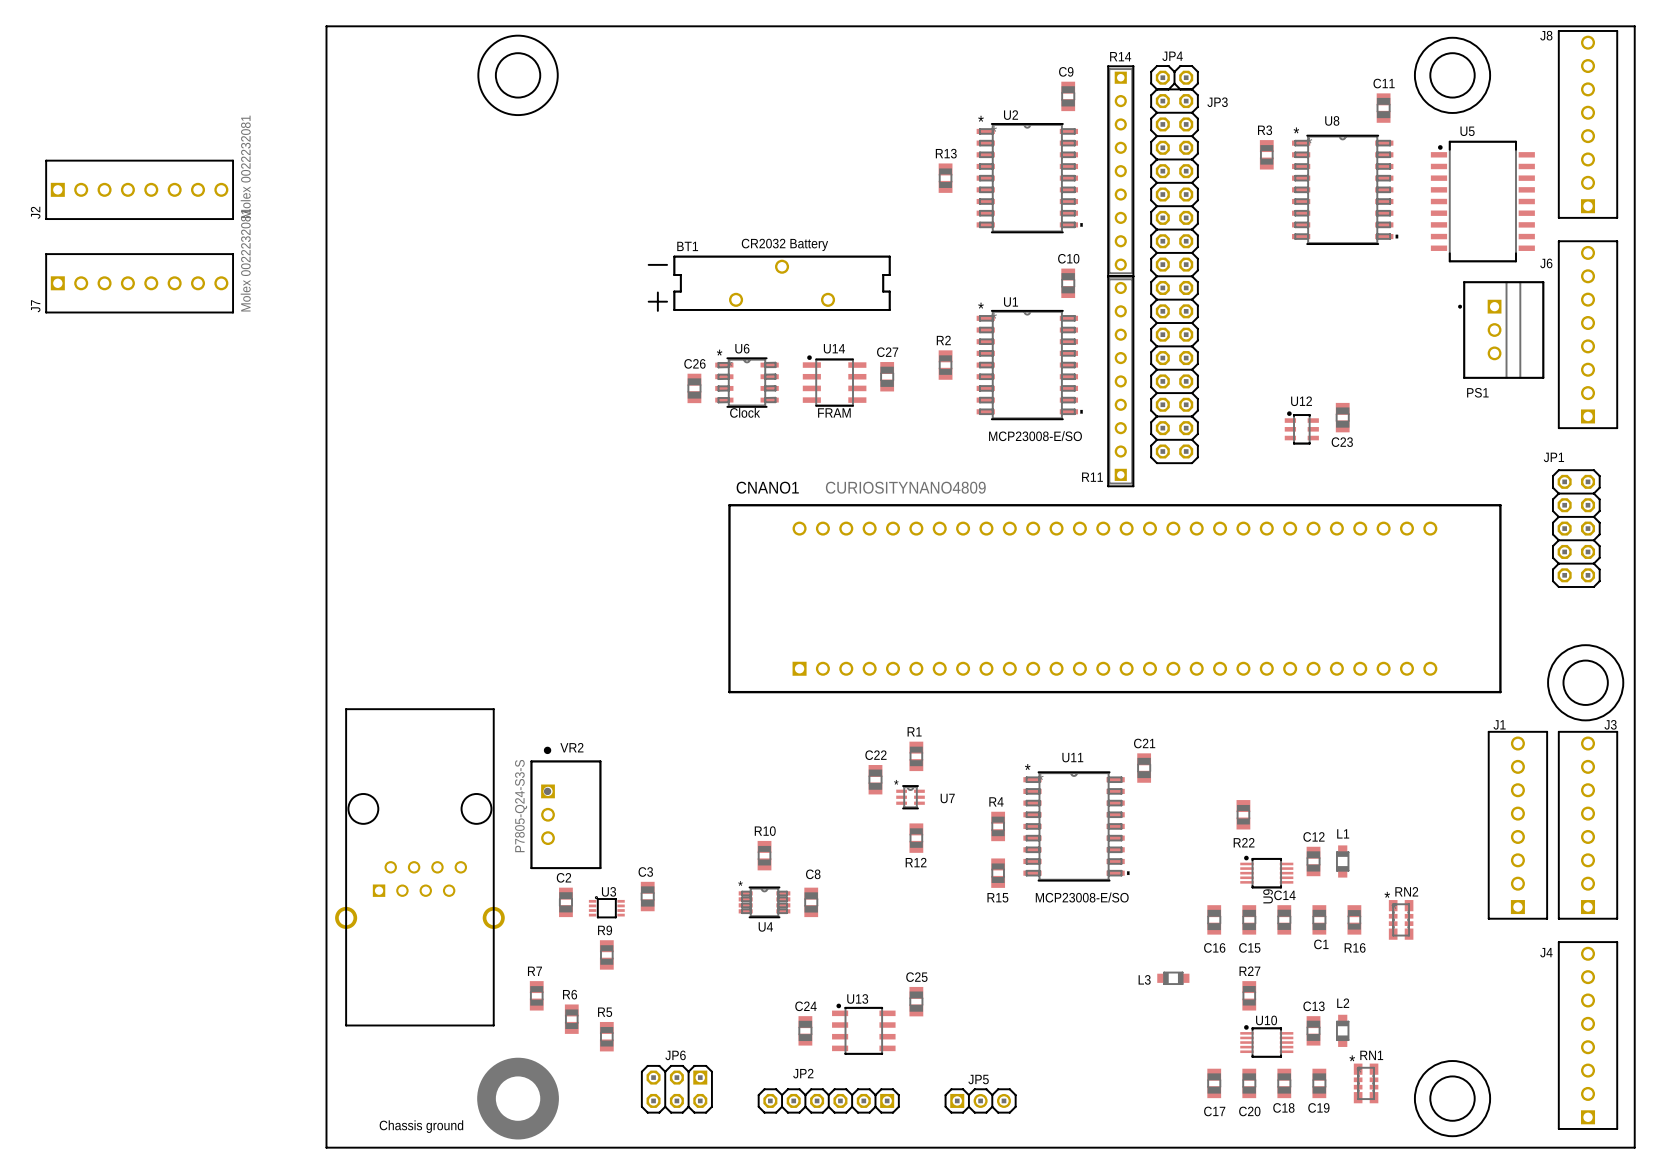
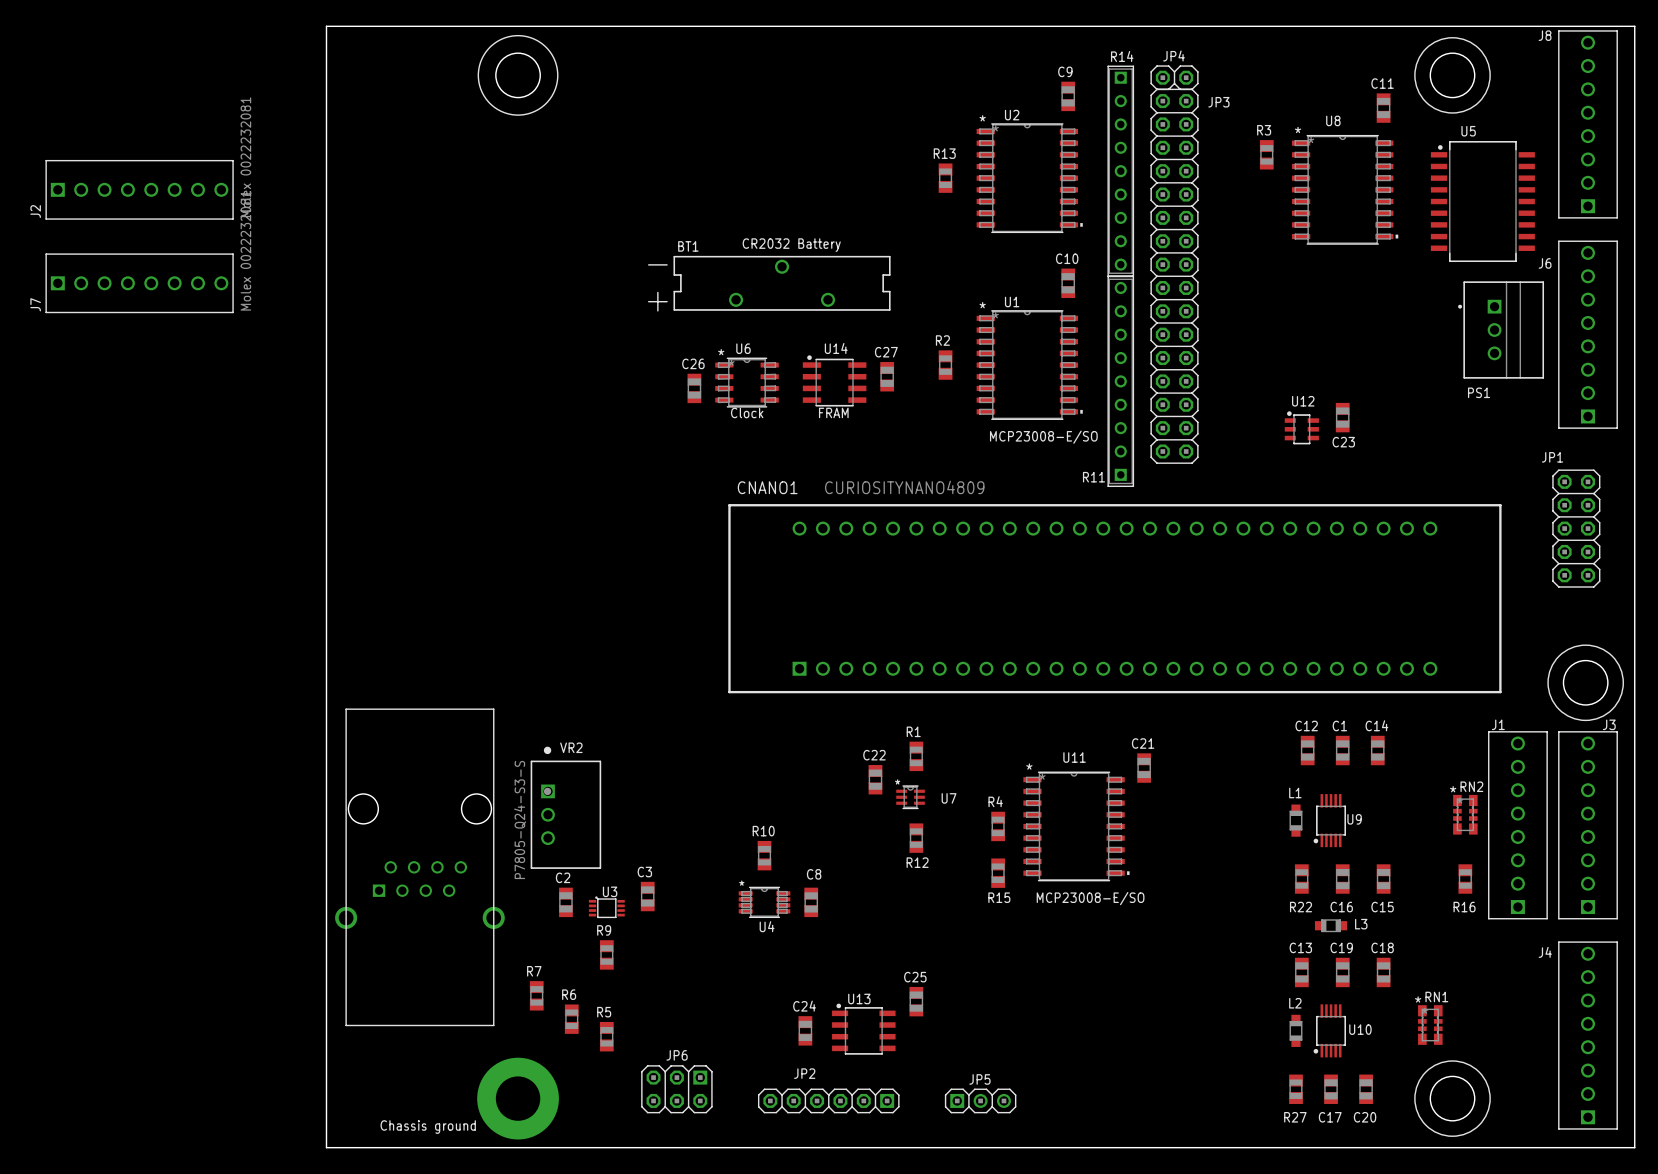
R22 position: (1243, 814) -> (1301, 879)
C12 position: (1313, 861) -> (1307, 750)
L1 position: (1342, 861) -> (1295, 820)
U9 rotation: 0° (1266, 871) -> 90° counterclockwise (1329, 820)
U9 position: (1266, 871) -> (1329, 820)
C16 position: (1214, 919) -> (1342, 879)
C15 position: (1249, 919) -> (1383, 879)
C14 position: (1284, 919) -> (1377, 750)
C1 position: (1319, 919) -> (1342, 750)
R16 position: (1354, 919) -> (1465, 879)
RN2 position: (1401, 919) -> (1465, 814)
C1 name position: C1 (1321, 944) -> C1 (1339, 725)
R27 name position: R27 (1249, 971) -> R27 (1295, 1117)
L3 rotation: 0° (1173, 978) -> 180° (1331, 925)
L3 position: (1173, 978) -> (1331, 925)
R27 position: (1249, 995) -> (1295, 1089)
U10 name position: U10 (1266, 1020) -> U10 (1360, 1029)
C13 position: (1313, 1030) -> (1301, 972)
L2 position: (1342, 1030) -> (1295, 1030)
U10 rotation: 0° (1266, 1041) -> 90° counterclockwise (1329, 1030)
U10 position: (1266, 1041) -> (1329, 1030)
C17 position: (1214, 1083) -> (1331, 1089)
C20 position: (1249, 1083) -> (1366, 1089)
C18 position: (1284, 1083) -> (1383, 972)
C19 position: (1319, 1083) -> (1342, 972)
RN1 position: (1366, 1083) -> (1430, 1025)
C18 name position: C18 (1283, 1107) -> C18 (1382, 947)
C19 name position: C19 (1318, 1107) -> C19 (1341, 947)

